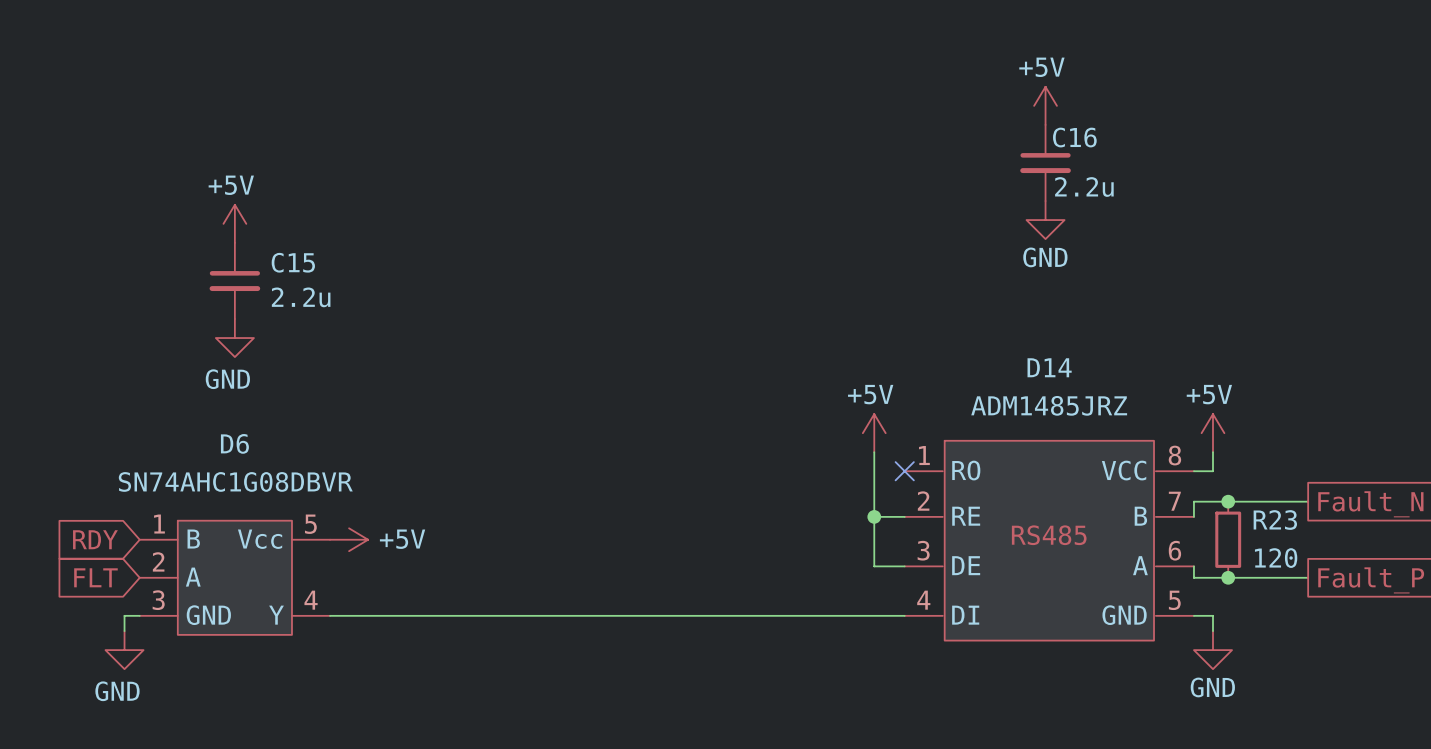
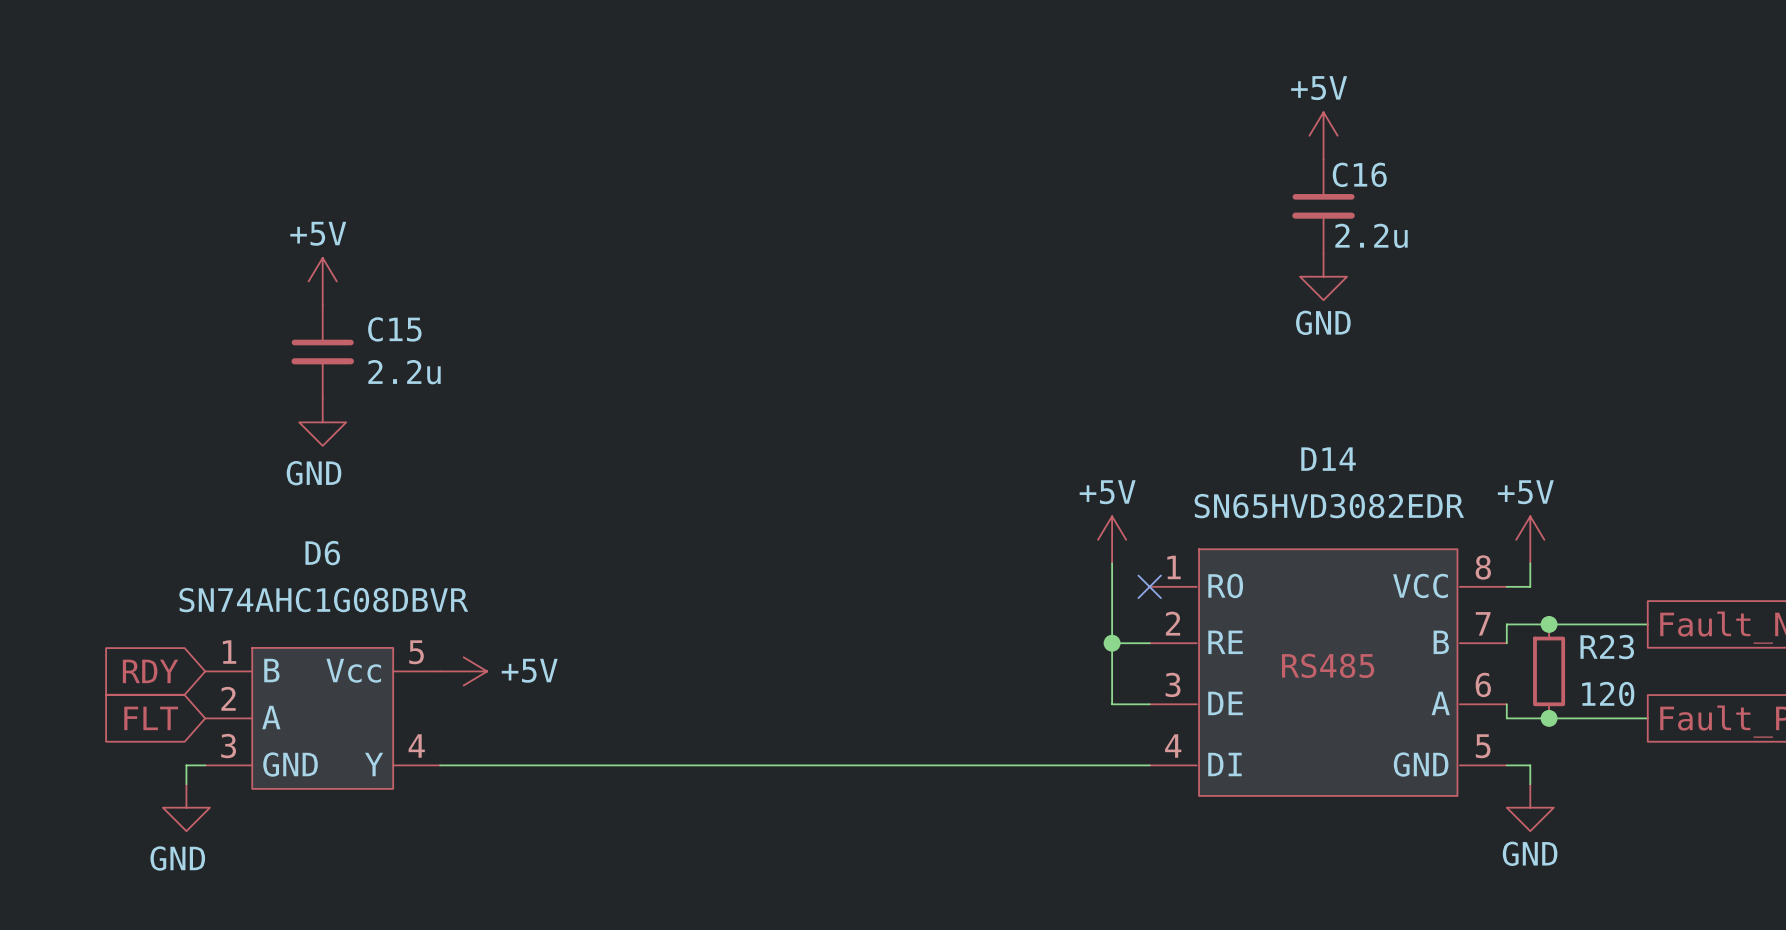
D14 value: ADM1485JRZ (1049, 405) -> SN65HVD3082EDR (1329, 506)

